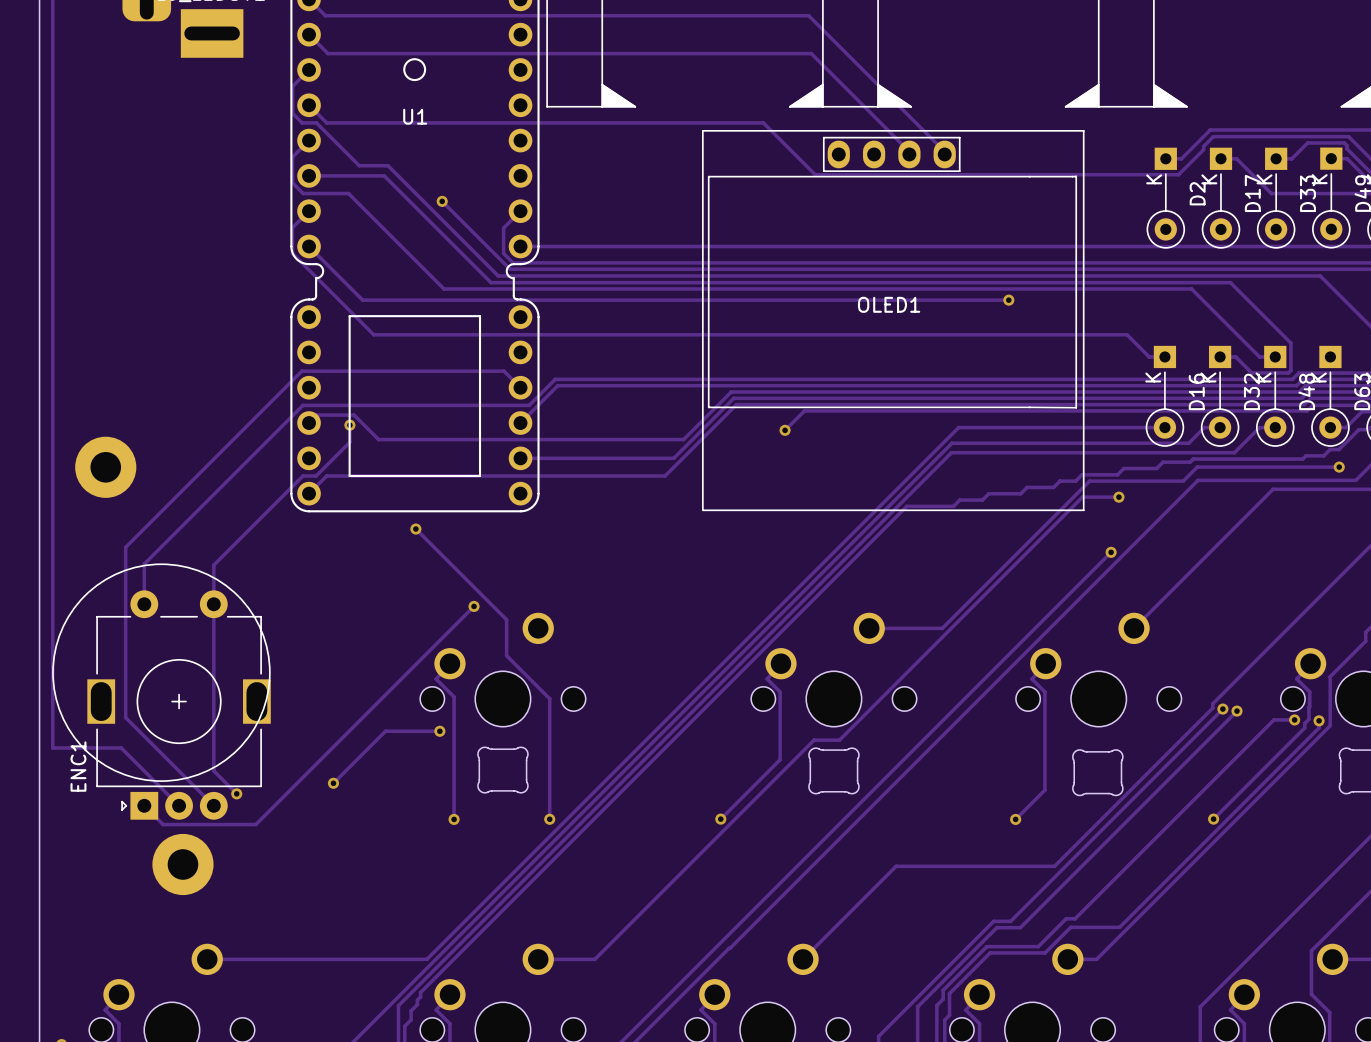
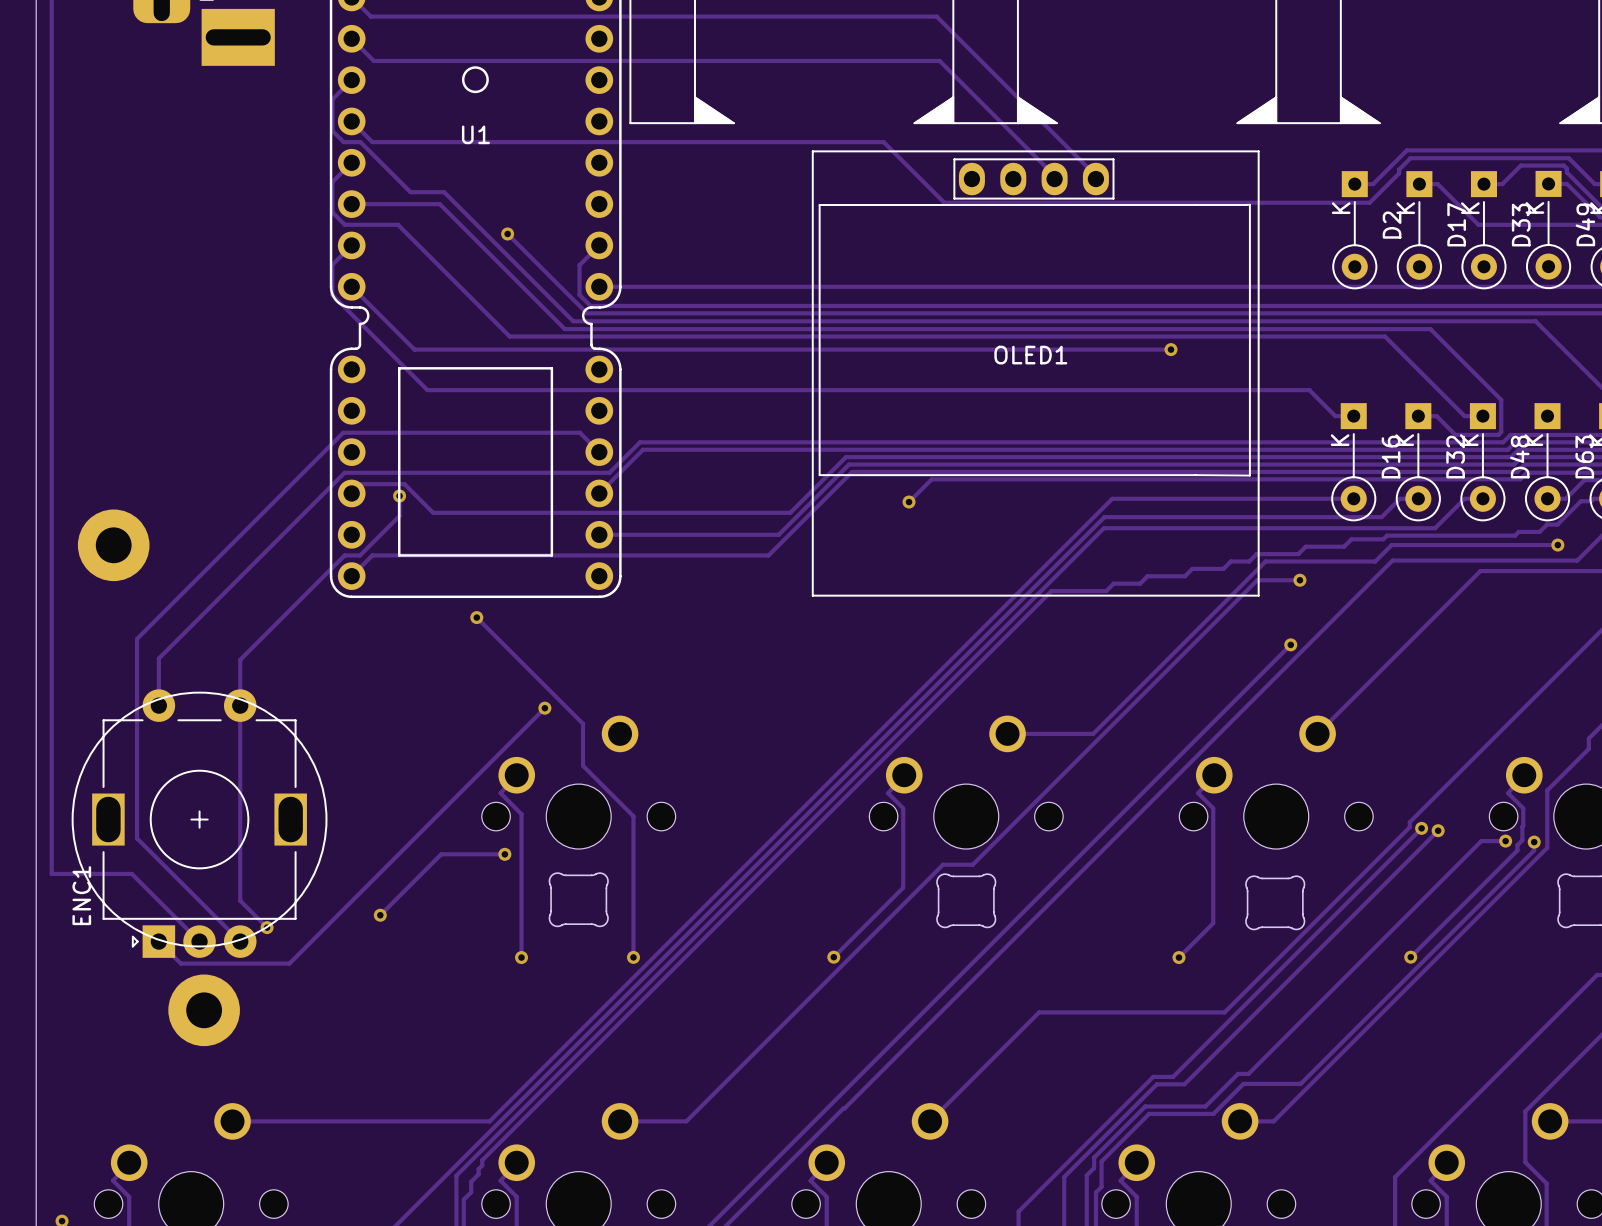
drawing position: (161, 672) -> (199, 819)

